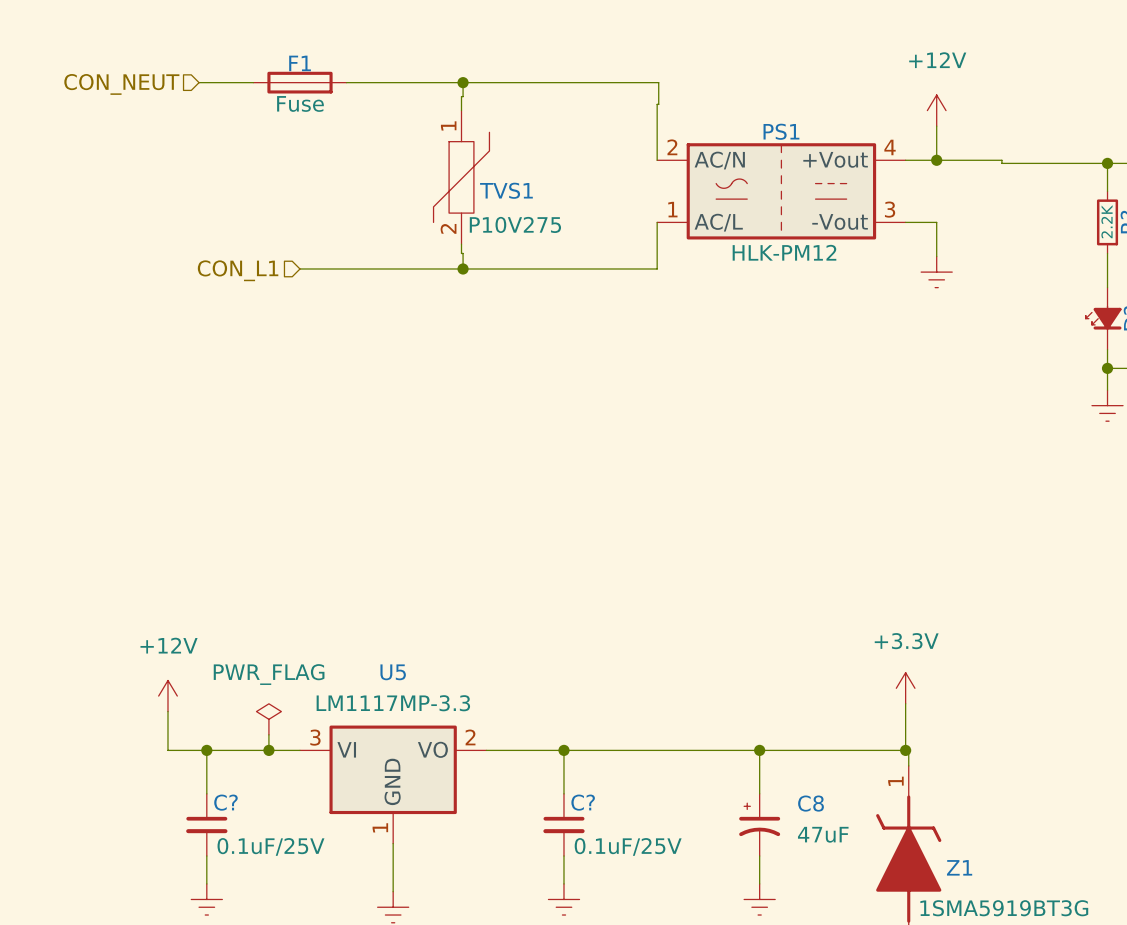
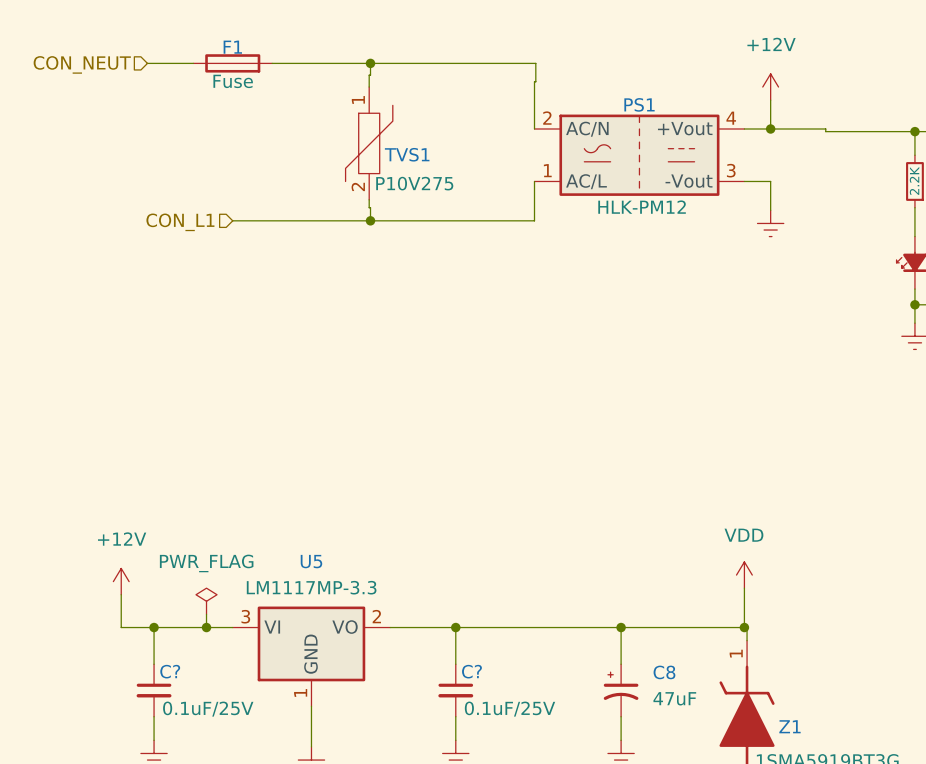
power symbol: +3.3V (905, 688) -> VDD (744, 575)

